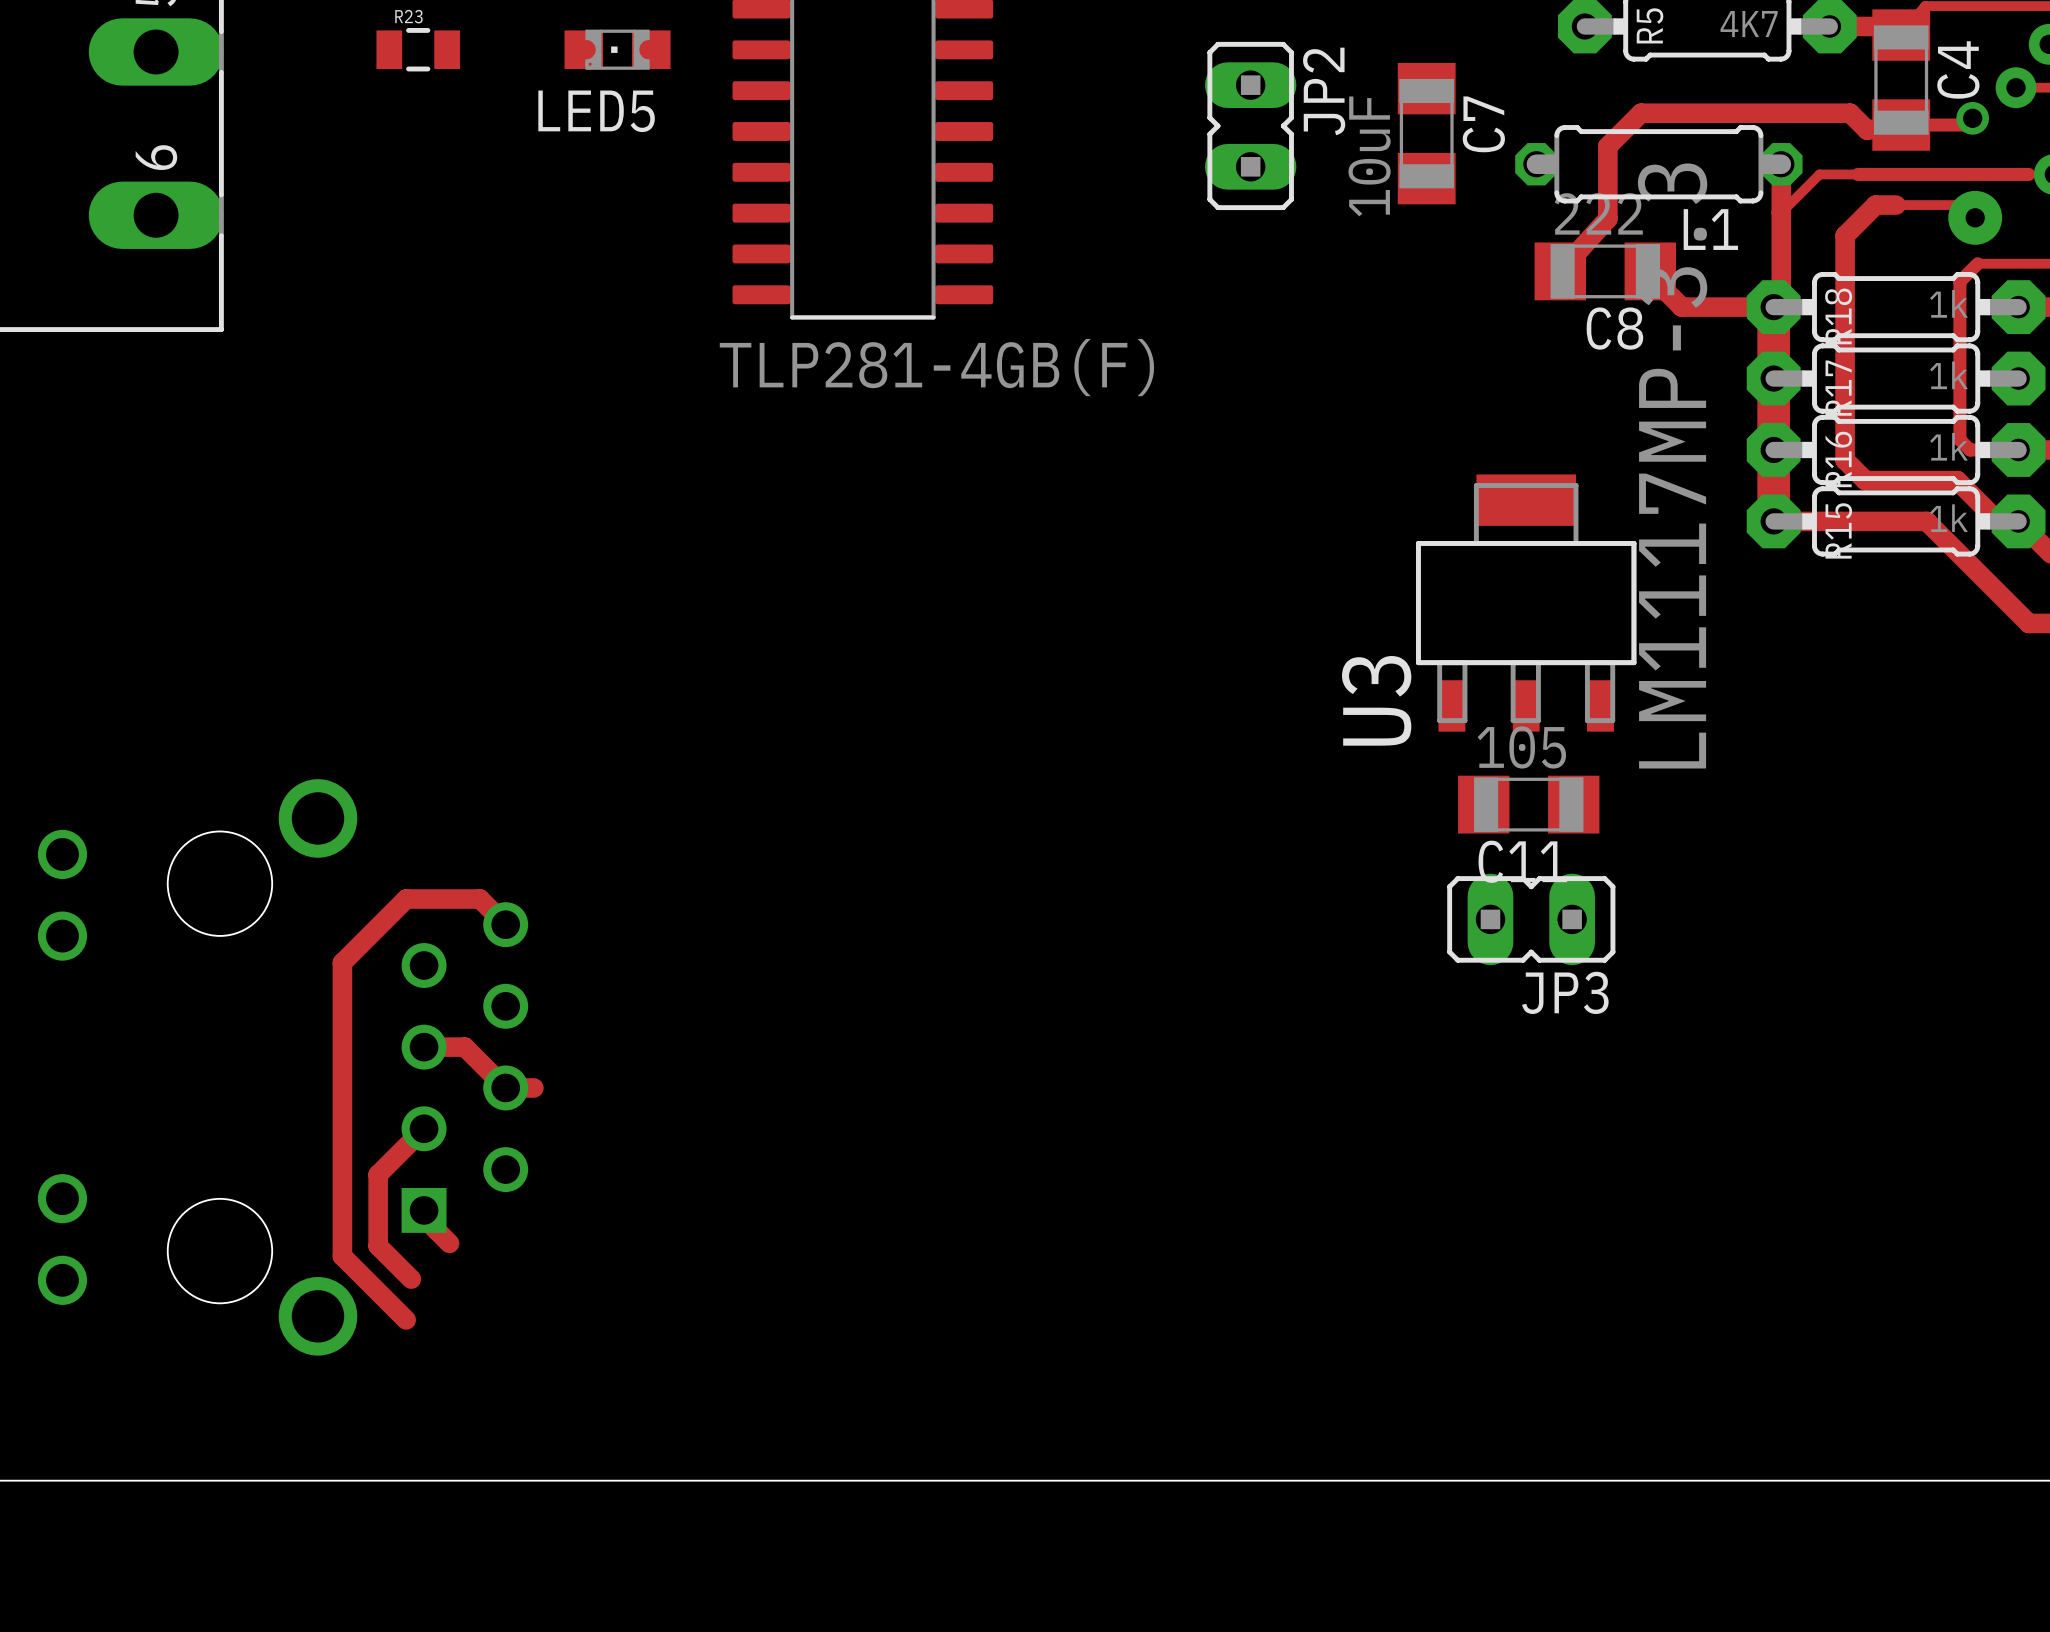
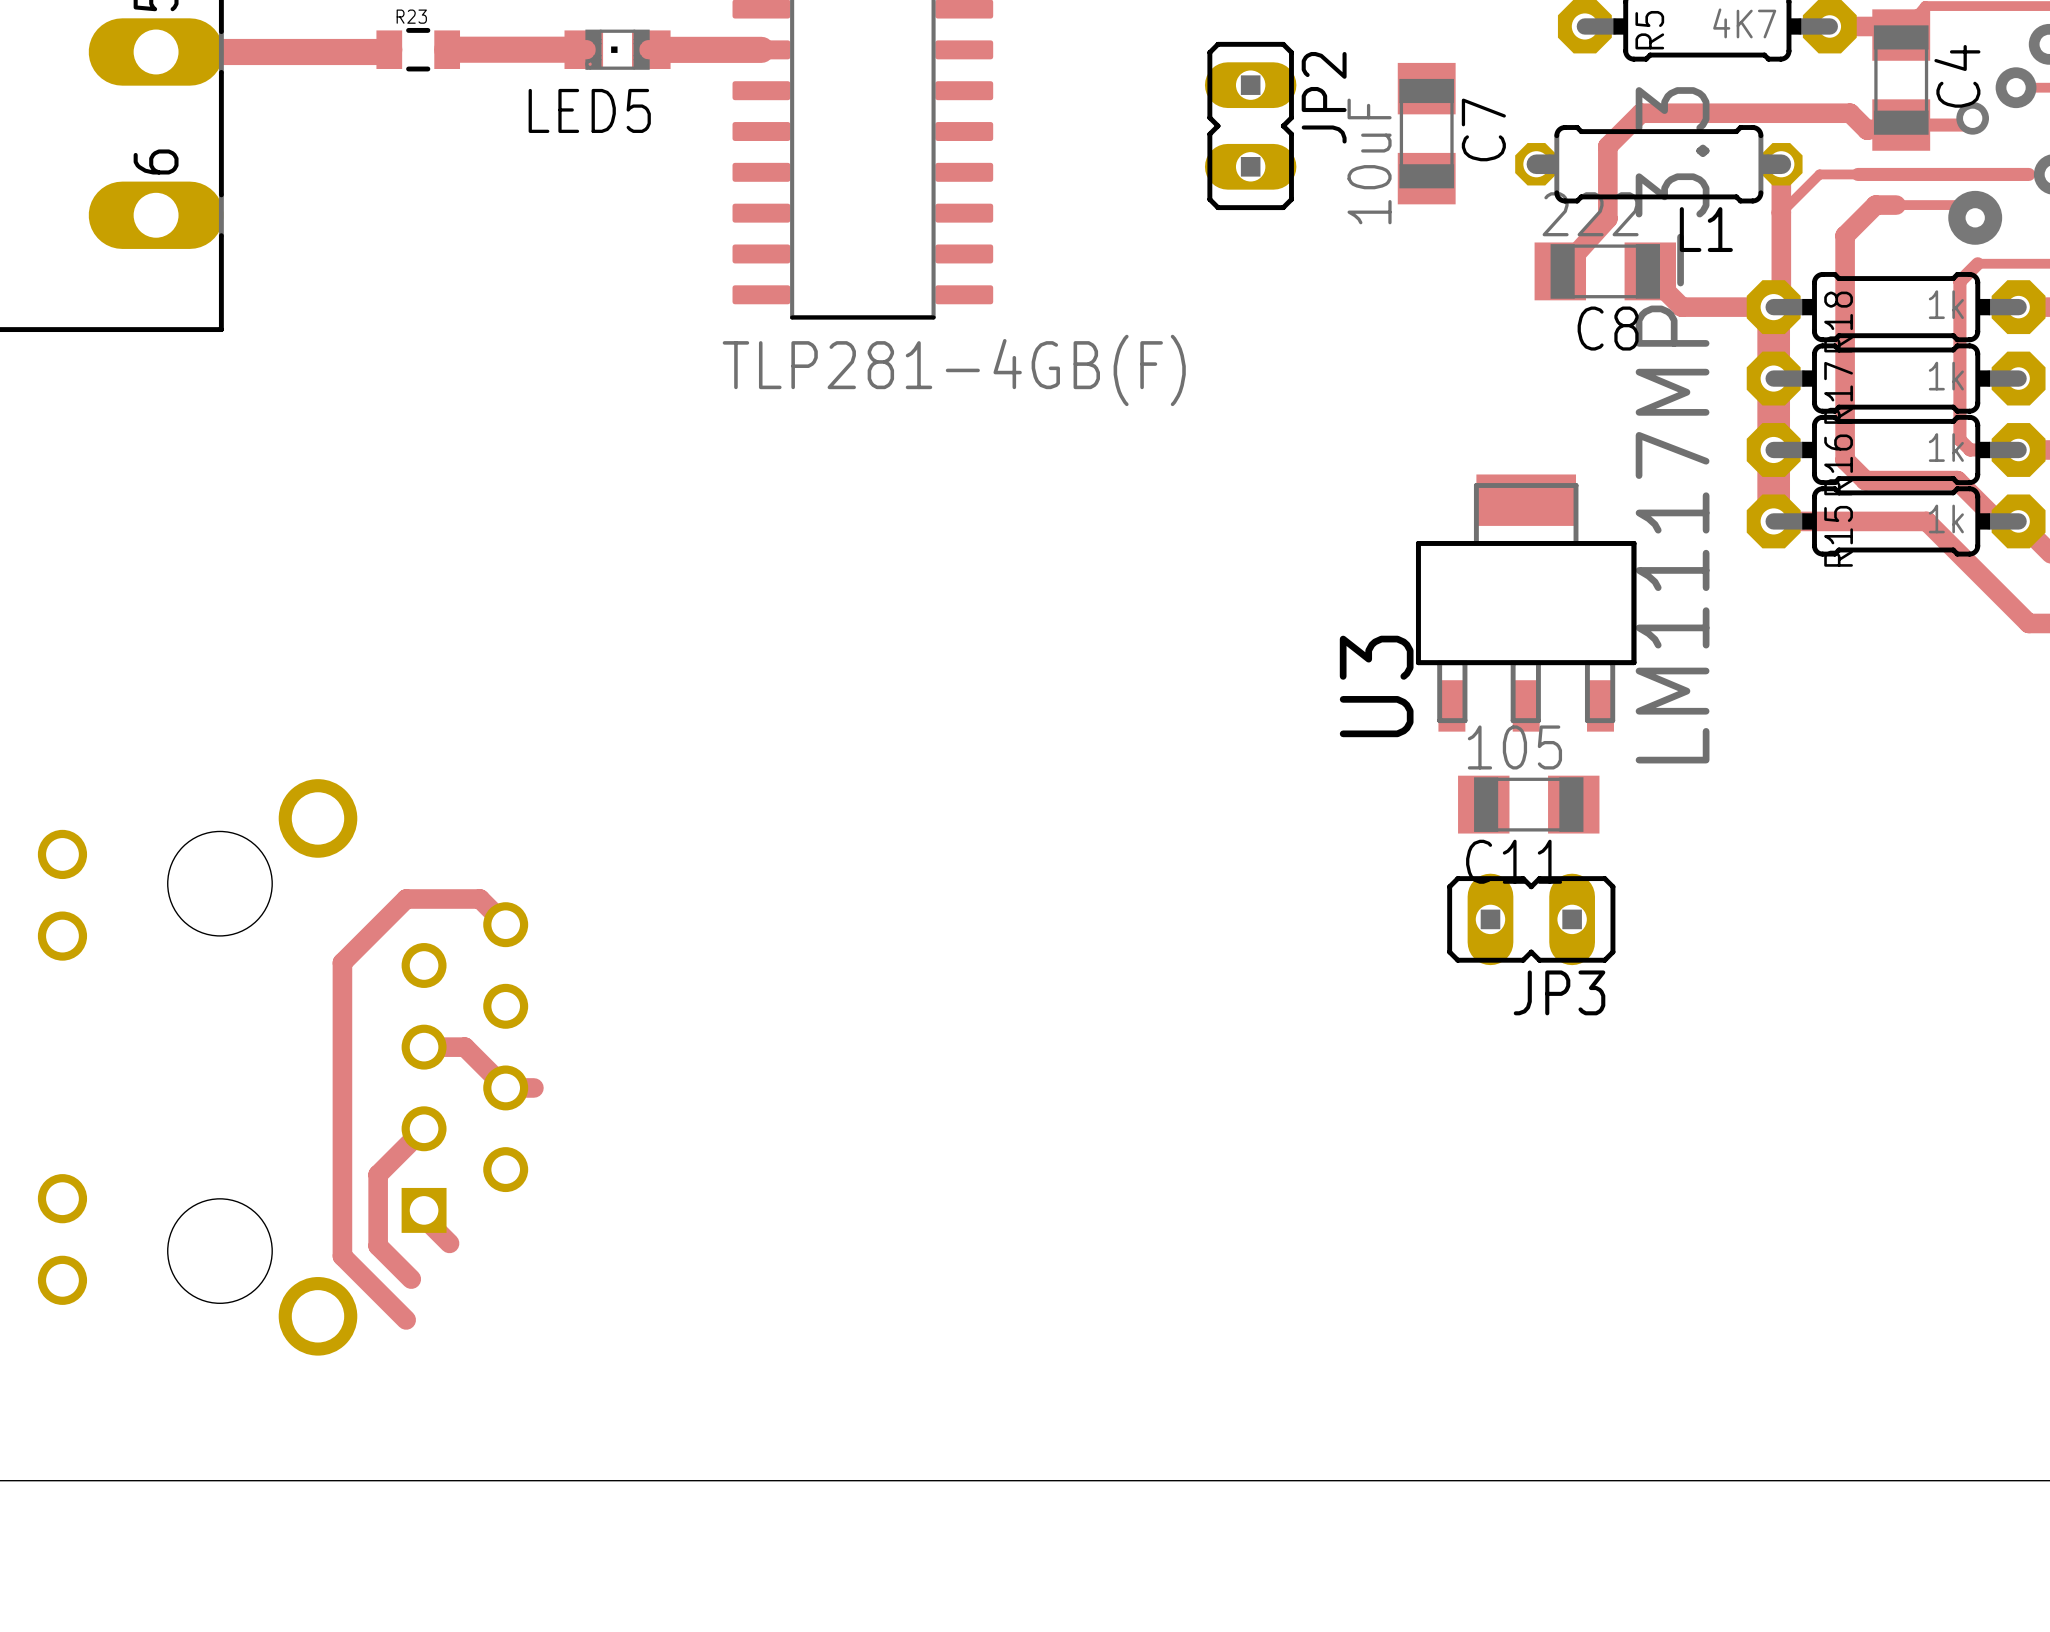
track: none -> (389, 49) (387, 51) (156, 51)
track: none -> (447, 49) (583, 49)
track: none -> (651, 49) (761, 49)

